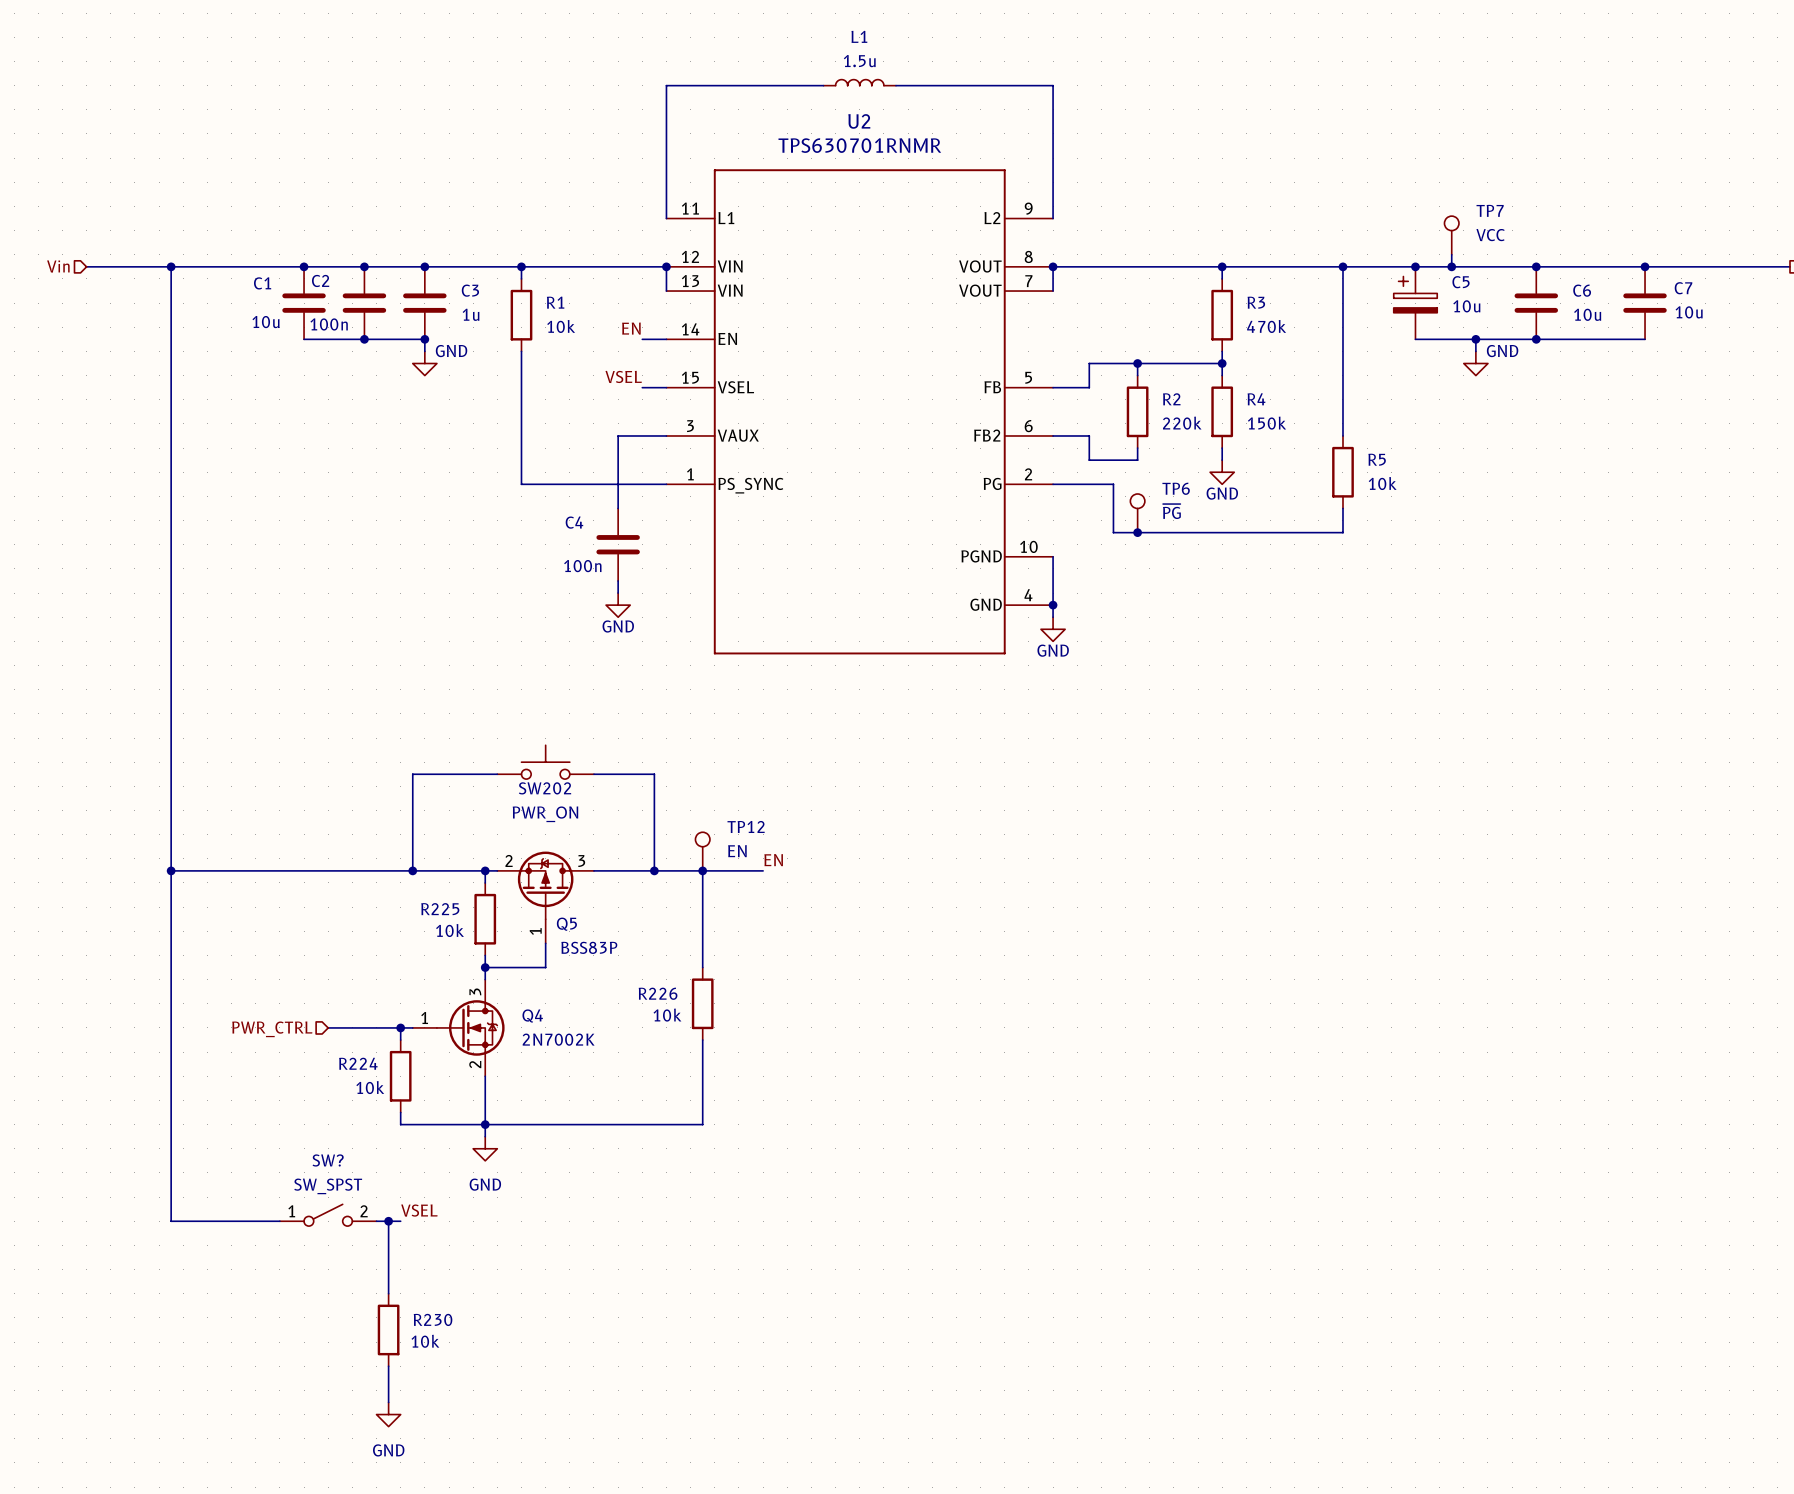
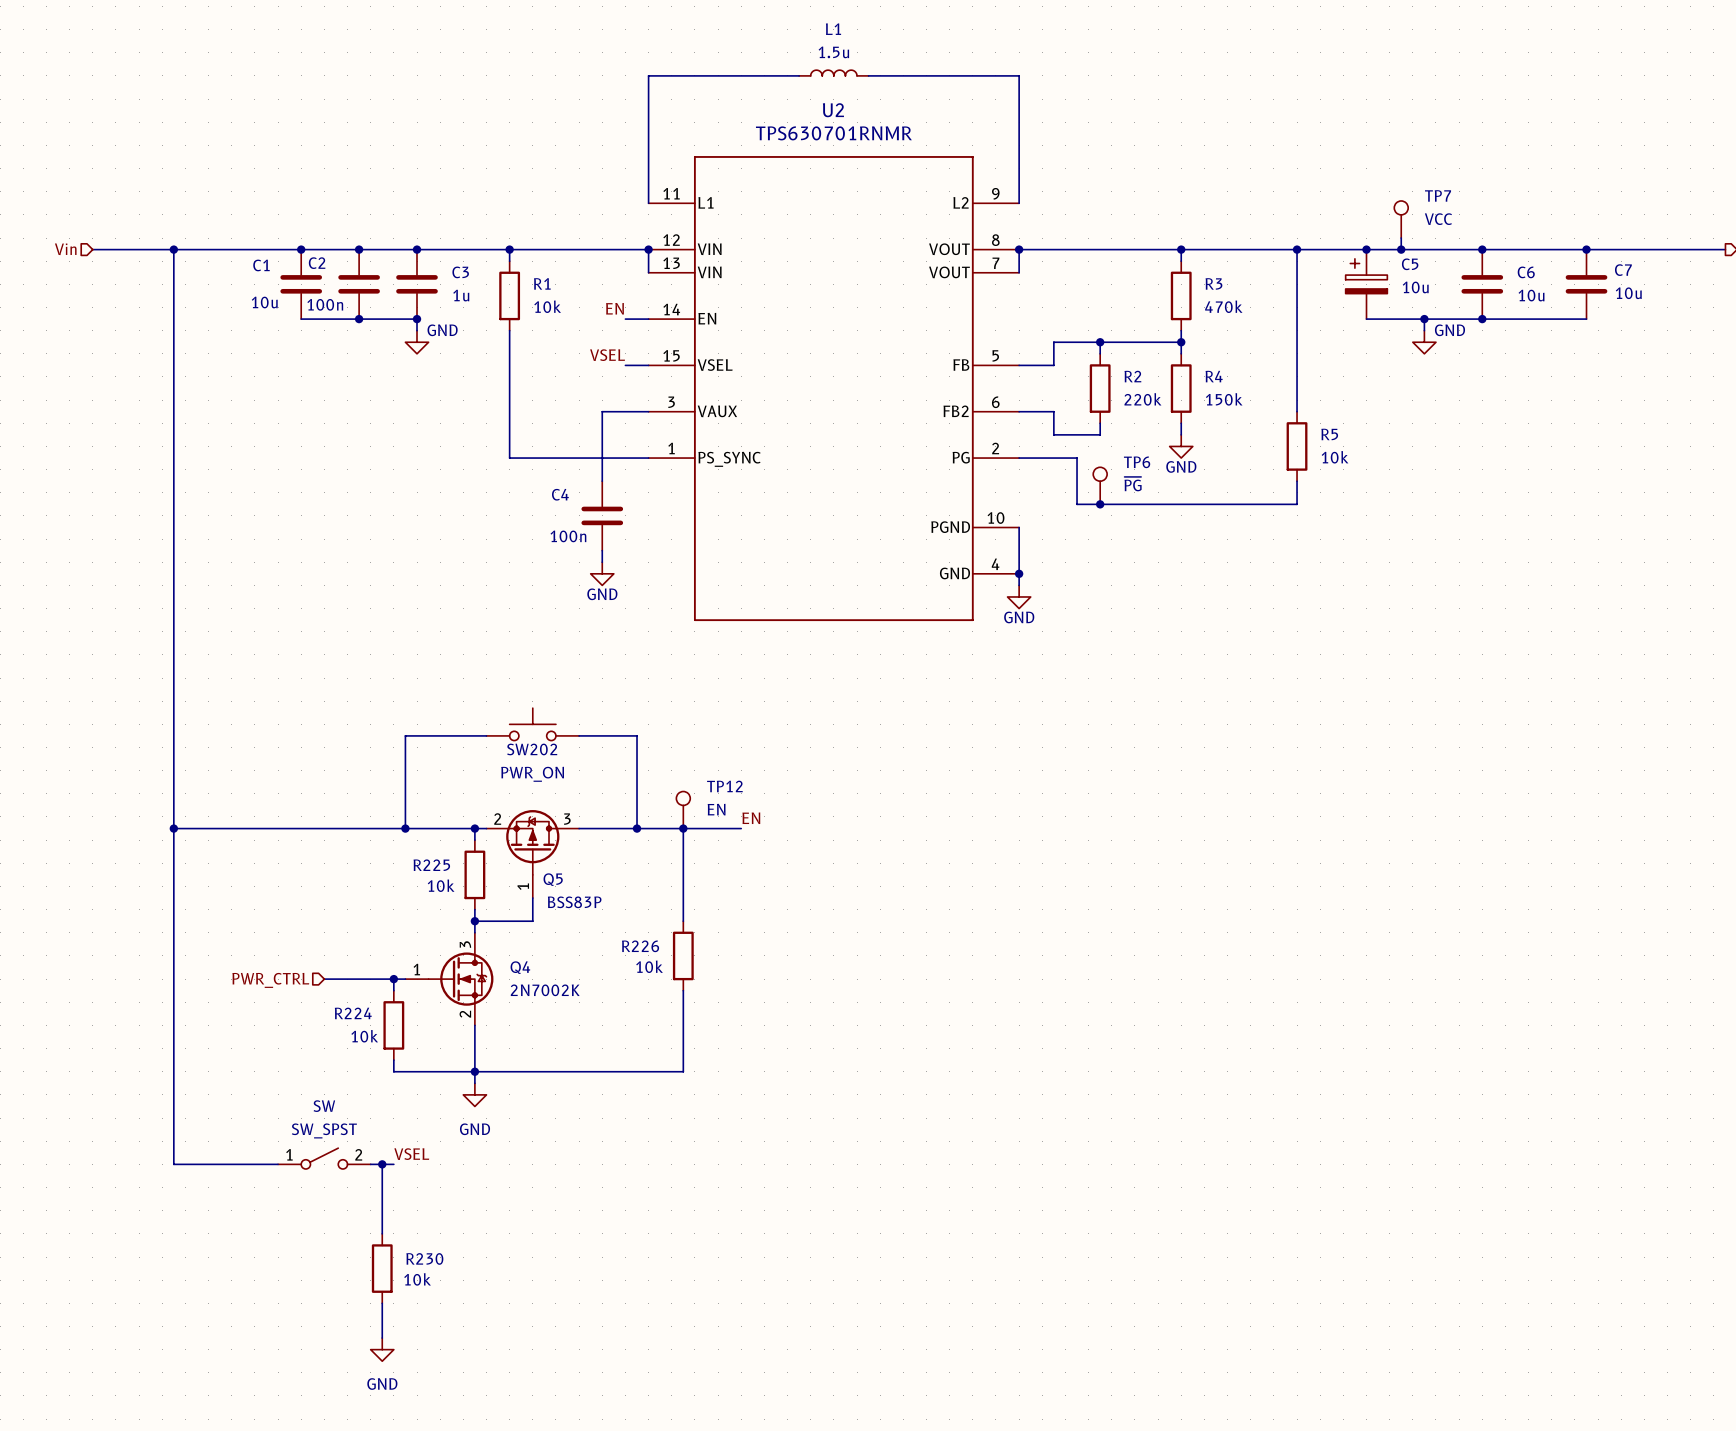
SW? name: SW? (328, 1160) -> SW (324, 1106)

